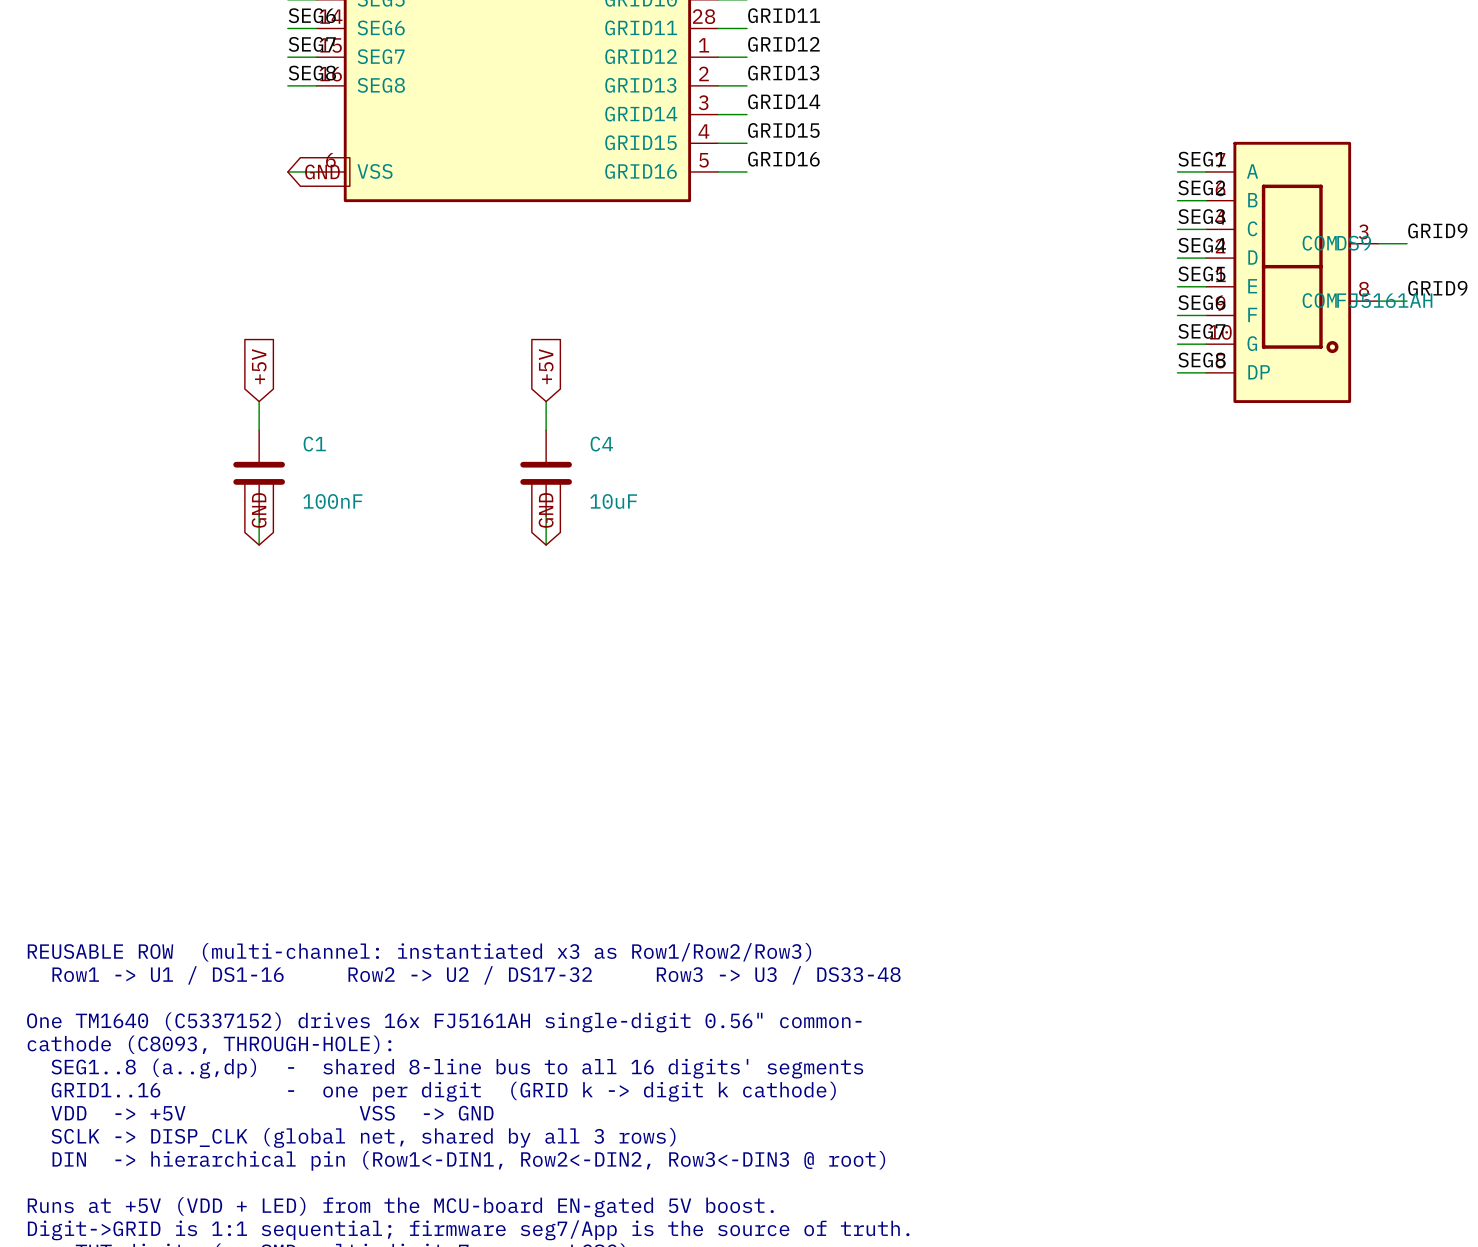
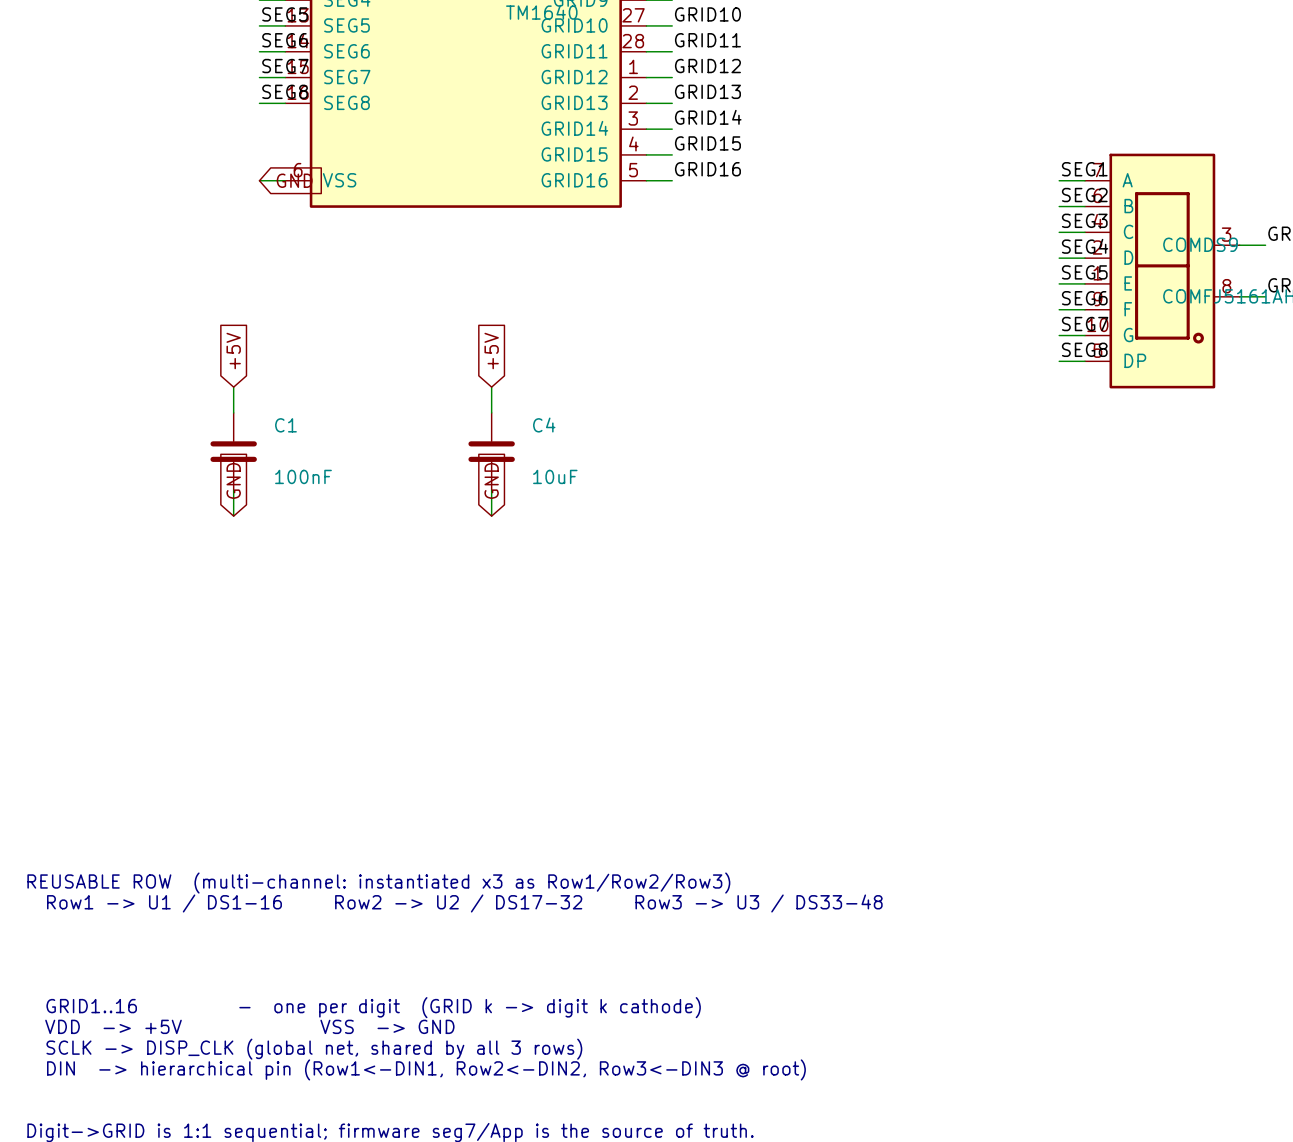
text: One TM1640 (C5337152) drives 16x FJ5161AH single-digit 0.56" common- (444, 1022) -> none
text: cathode (C8093, THROUGH-HOLE): (209, 1044) -> none
text: SEG1..8 (a..g,dp) - shared 8-line bus to all 16 digits' segments (457, 1068) -> none
text: Runs at +5V (VDD + LED) from the MCU-board EN-gated 5V boost. (400, 1207) -> none

